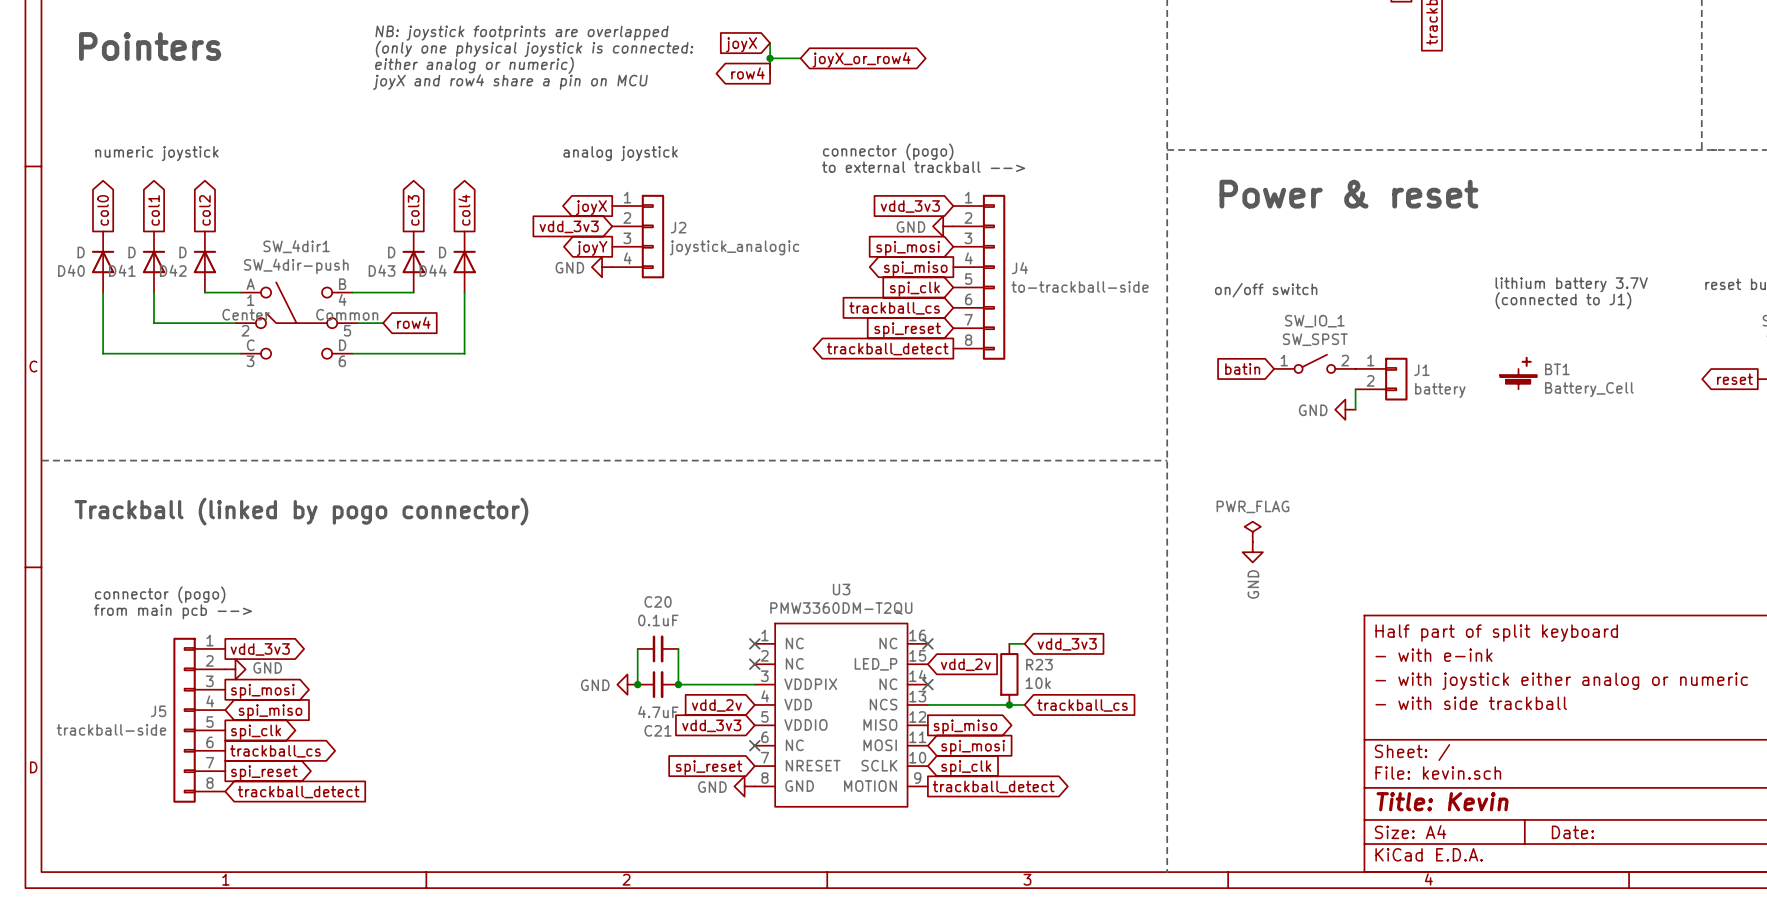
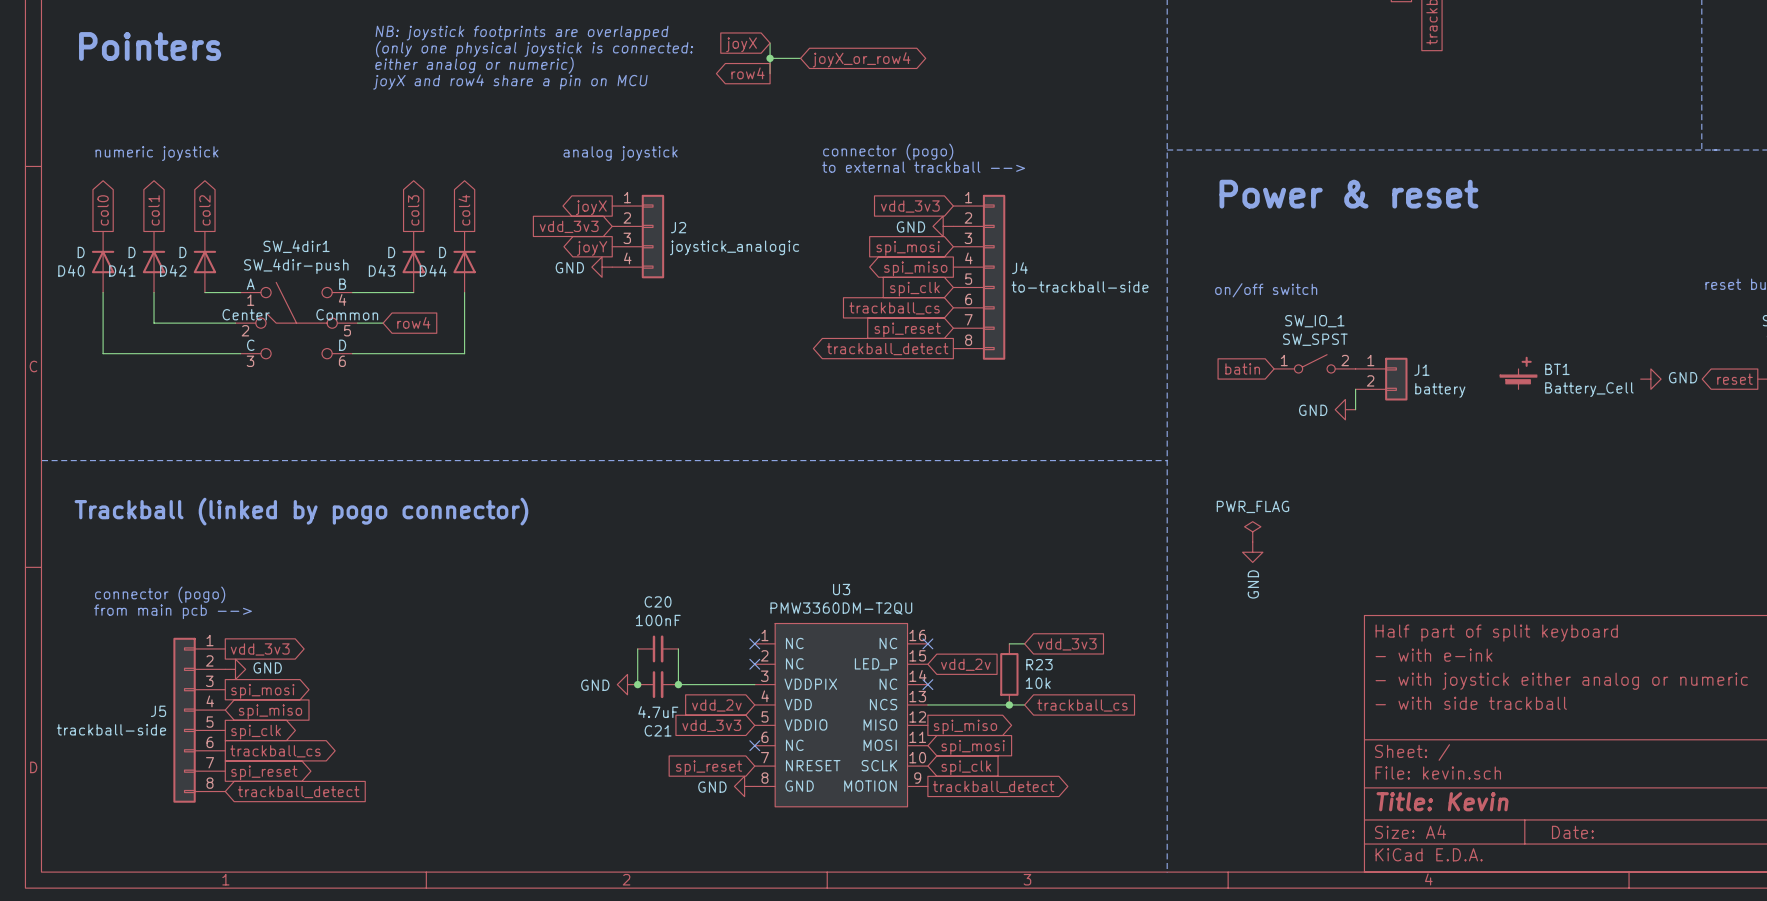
text: lithium battery 3.7V (1571, 284) -> none
text: (connected to J1) (1563, 300) -> none
power symbol: none -> GND (1650, 379)
C20 value: 0.1uF (658, 620) -> 100nF (658, 620)

